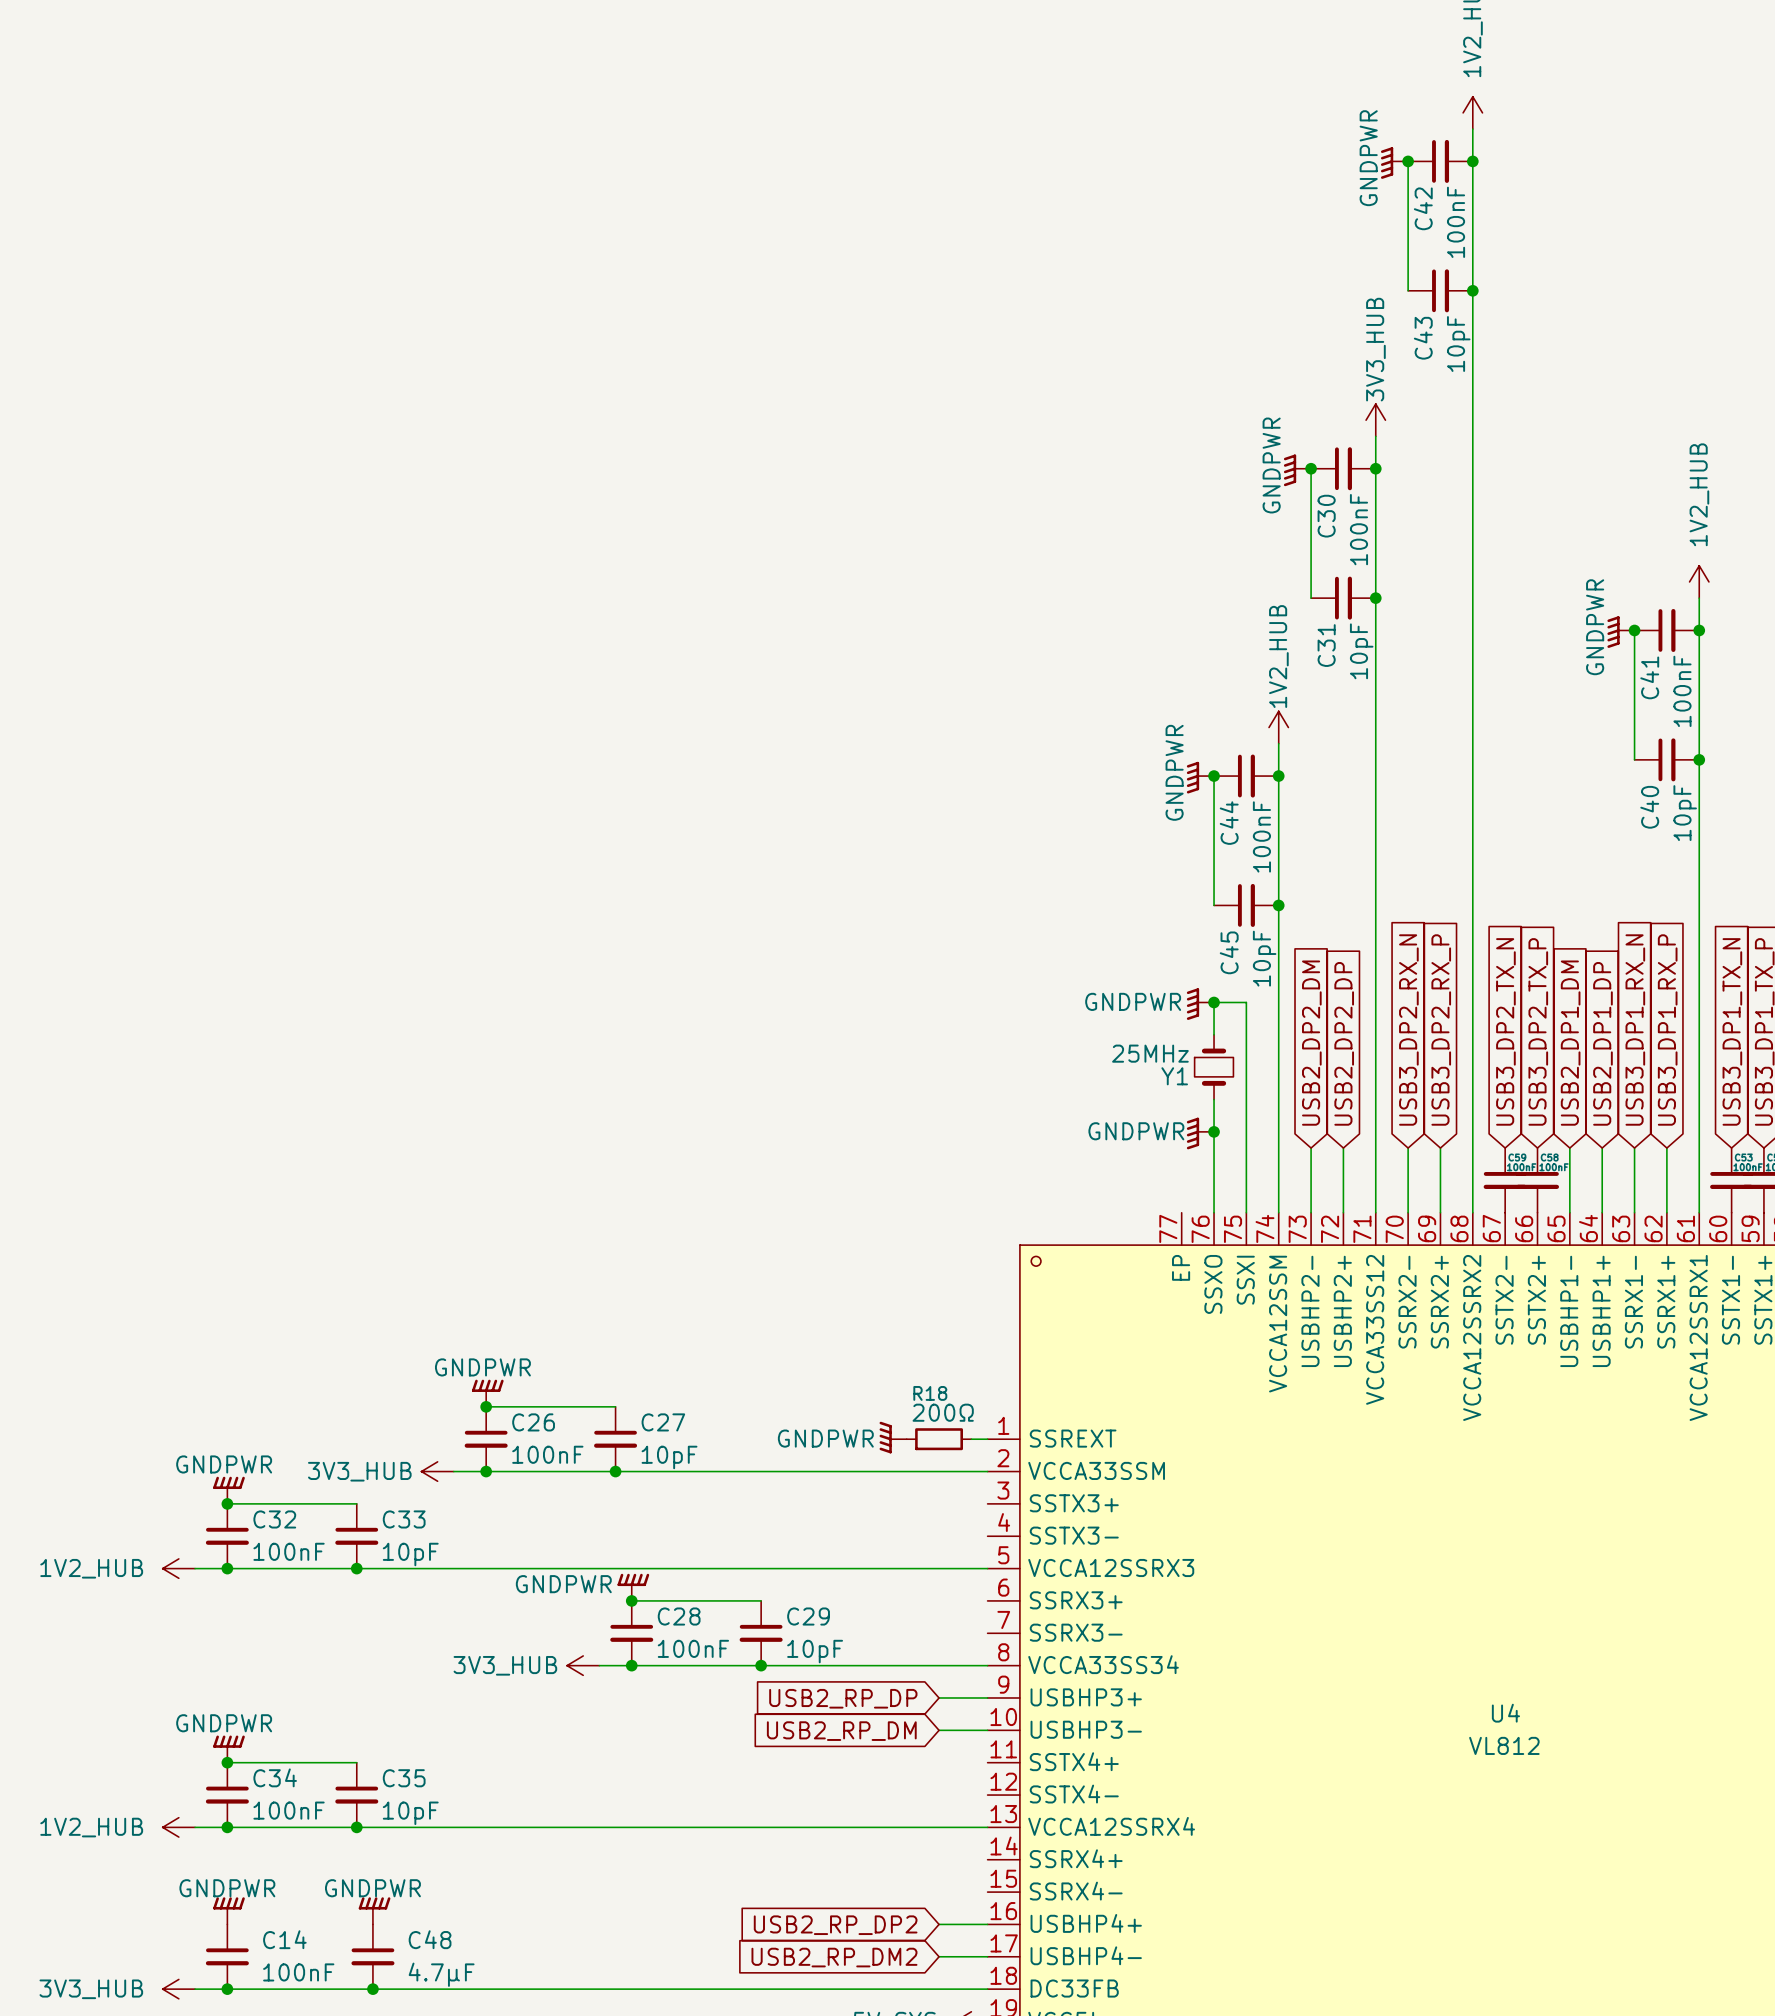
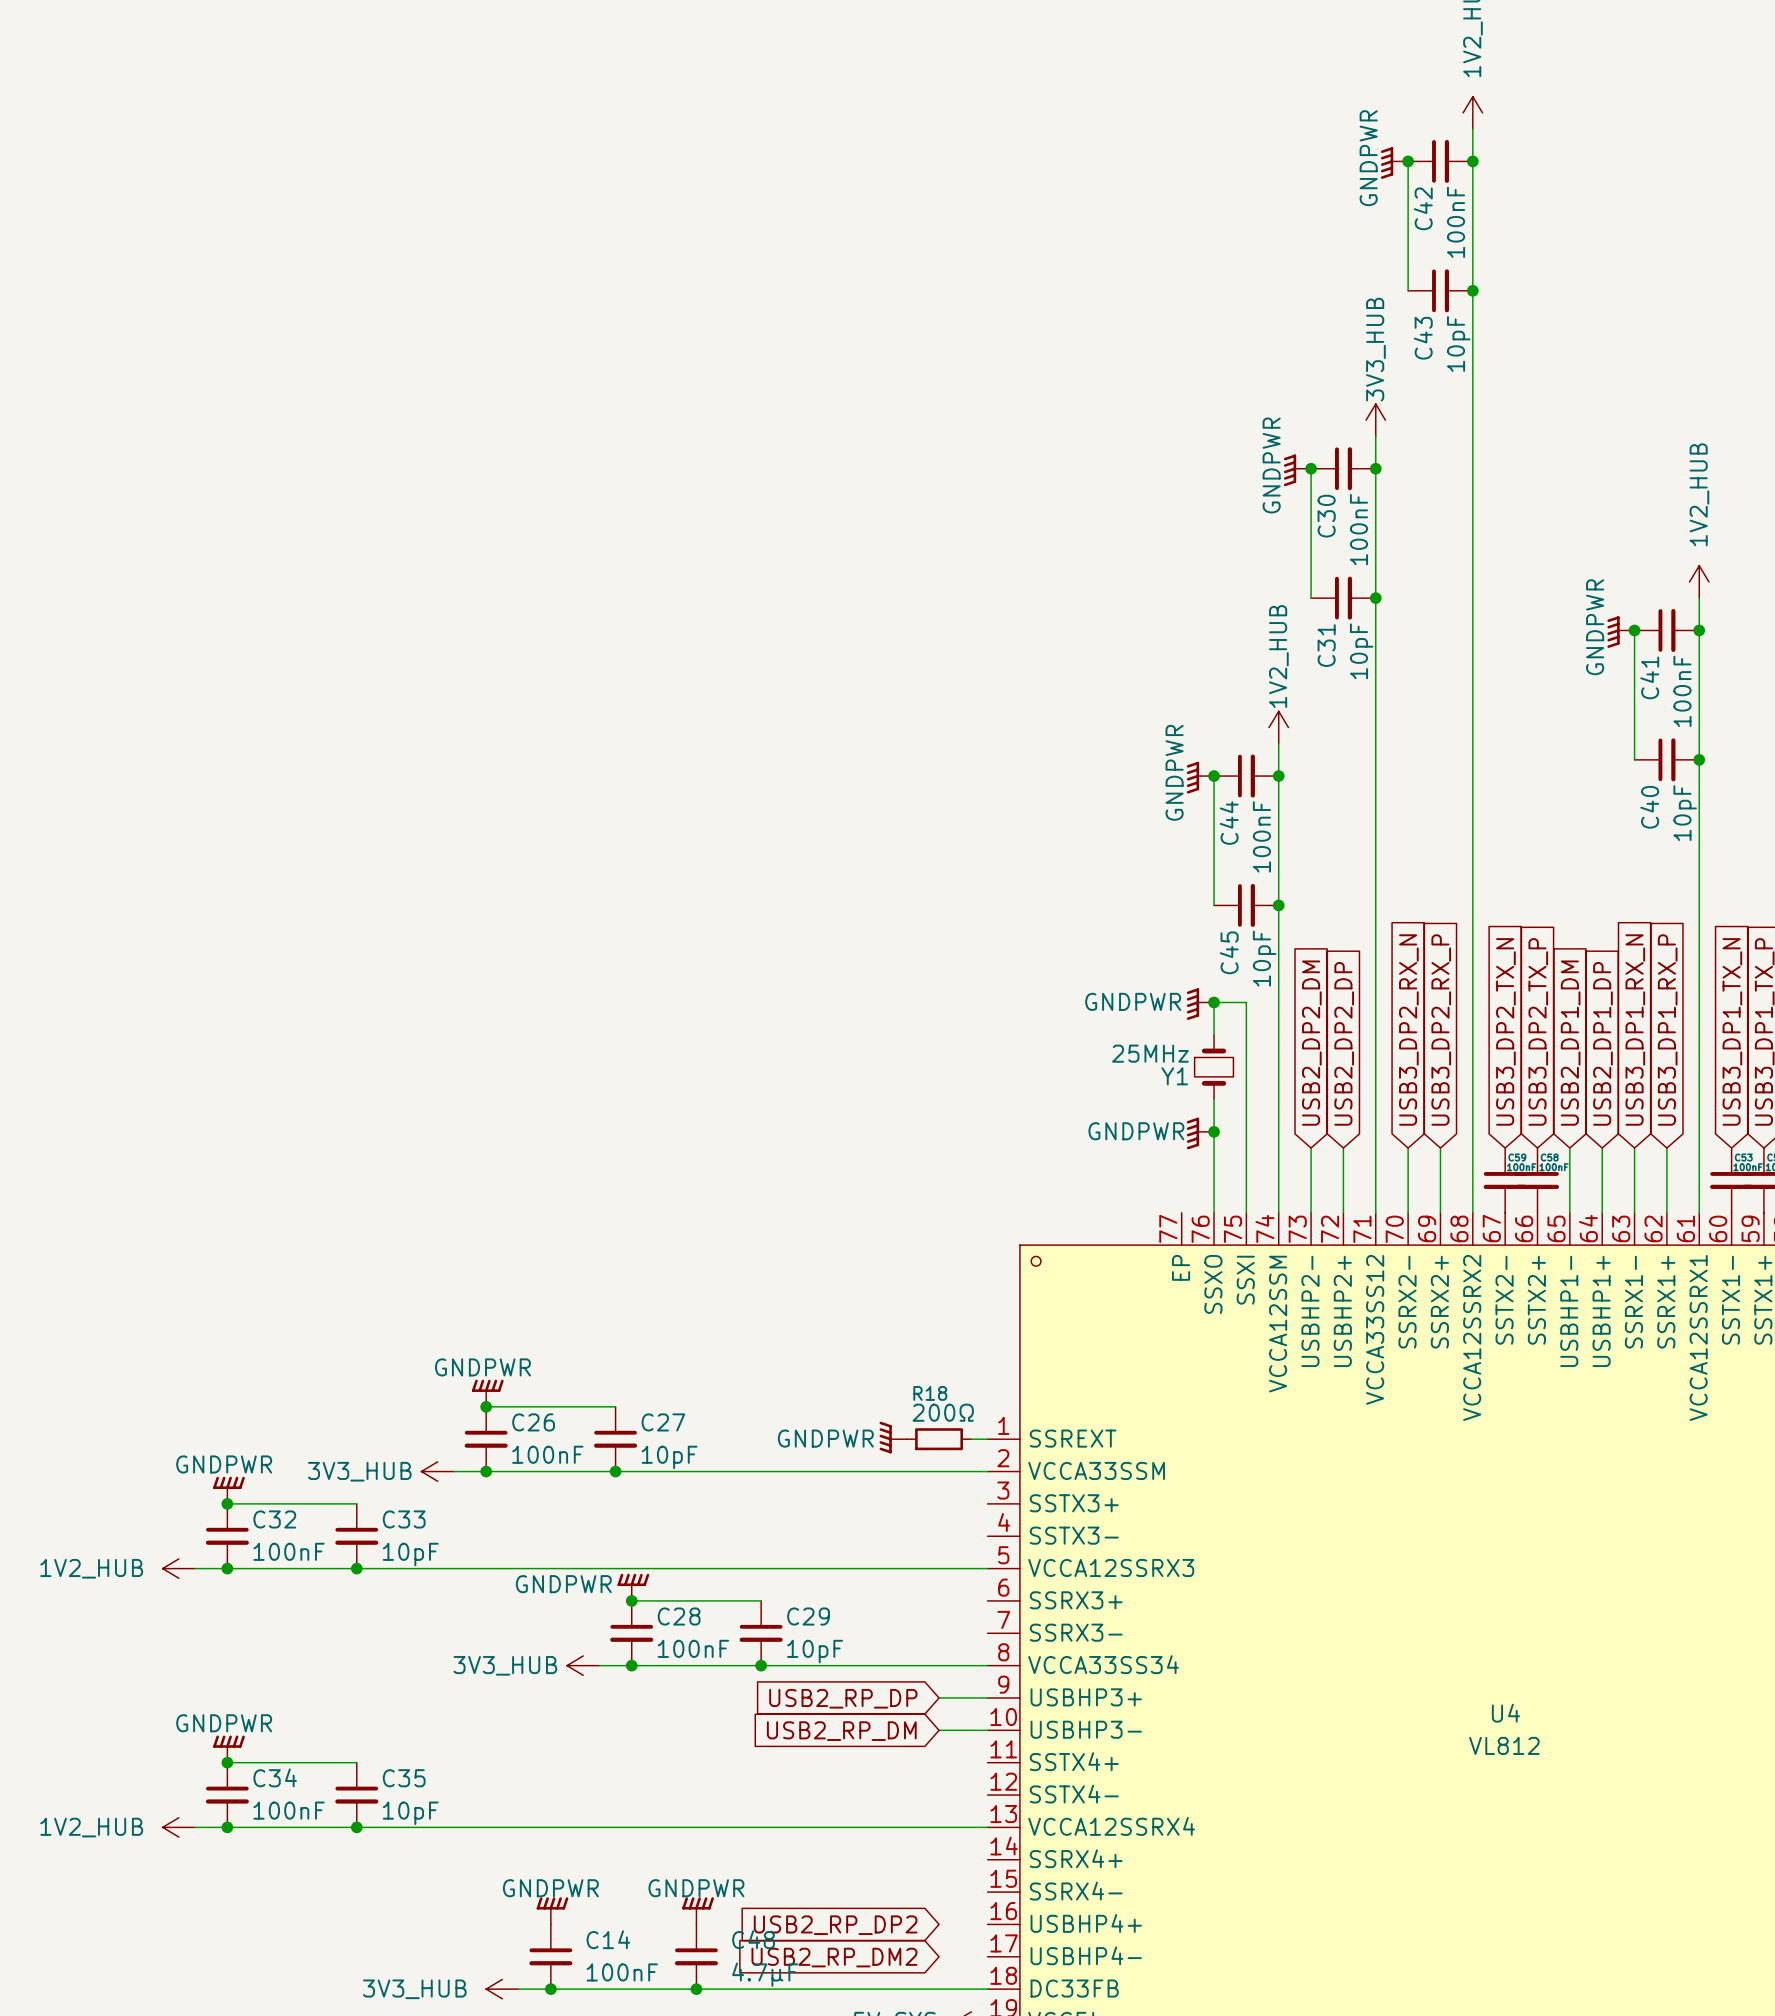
power symbol: GNDPWR (228, 1910) -> none
power symbol: GNDPWR (374, 1910) -> none
power symbol: none -> GNDPWR (552, 1910)
power symbol: none -> GNDPWR (698, 1910)
wire: (939, 1924) (987, 1924) -> none
C14 position: (227, 1956) -> (550, 1956)
C48 position: (372, 1956) -> (696, 1956)
wire: (939, 1956) (987, 1956) -> none
power symbol: 3V3_HUB (178, 1989) -> none
wire: (195, 1989) (518, 1989) -> none
junction: (227, 1989) -> none
junction: (372, 1989) -> none
power symbol: none -> 3V3_HUB (502, 1989)
junction: none -> (550, 1989)
junction: none -> (696, 1989)

